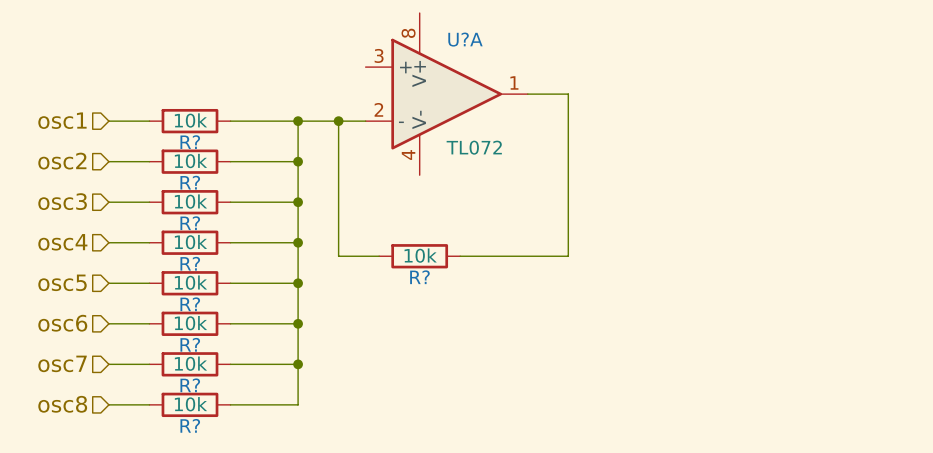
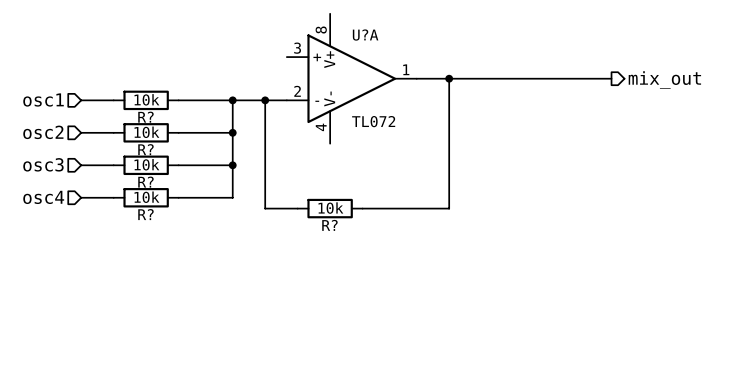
wire: none -> (449, 78) (611, 78)
junction: none -> (449, 78)
hierarchical label: none -> mix_out (664, 80)
wire: (298, 242) (298, 404) (230, 404) -> none
junction: (298, 242) -> none
hierarchical label: osc5 (62, 282) -> none
wire: (108, 283) (149, 283) -> none
R?: 10k (189, 283) -> none
wire: (230, 283) (298, 283) -> none
junction: (298, 283) -> none
hierarchical label: osc6 (62, 323) -> none
wire: (108, 323) (149, 323) -> none
R?: 10k (189, 323) -> none
wire: (230, 323) (298, 323) -> none
junction: (298, 323) -> none
hierarchical label: osc7 (62, 363) -> none
wire: (108, 364) (149, 364) -> none
R?: 10k (189, 364) -> none
wire: (230, 364) (298, 364) -> none
junction: (298, 364) -> none
hierarchical label: osc8 (62, 404) -> none
wire: (108, 404) (149, 404) -> none
R?: 10k (189, 404) -> none

